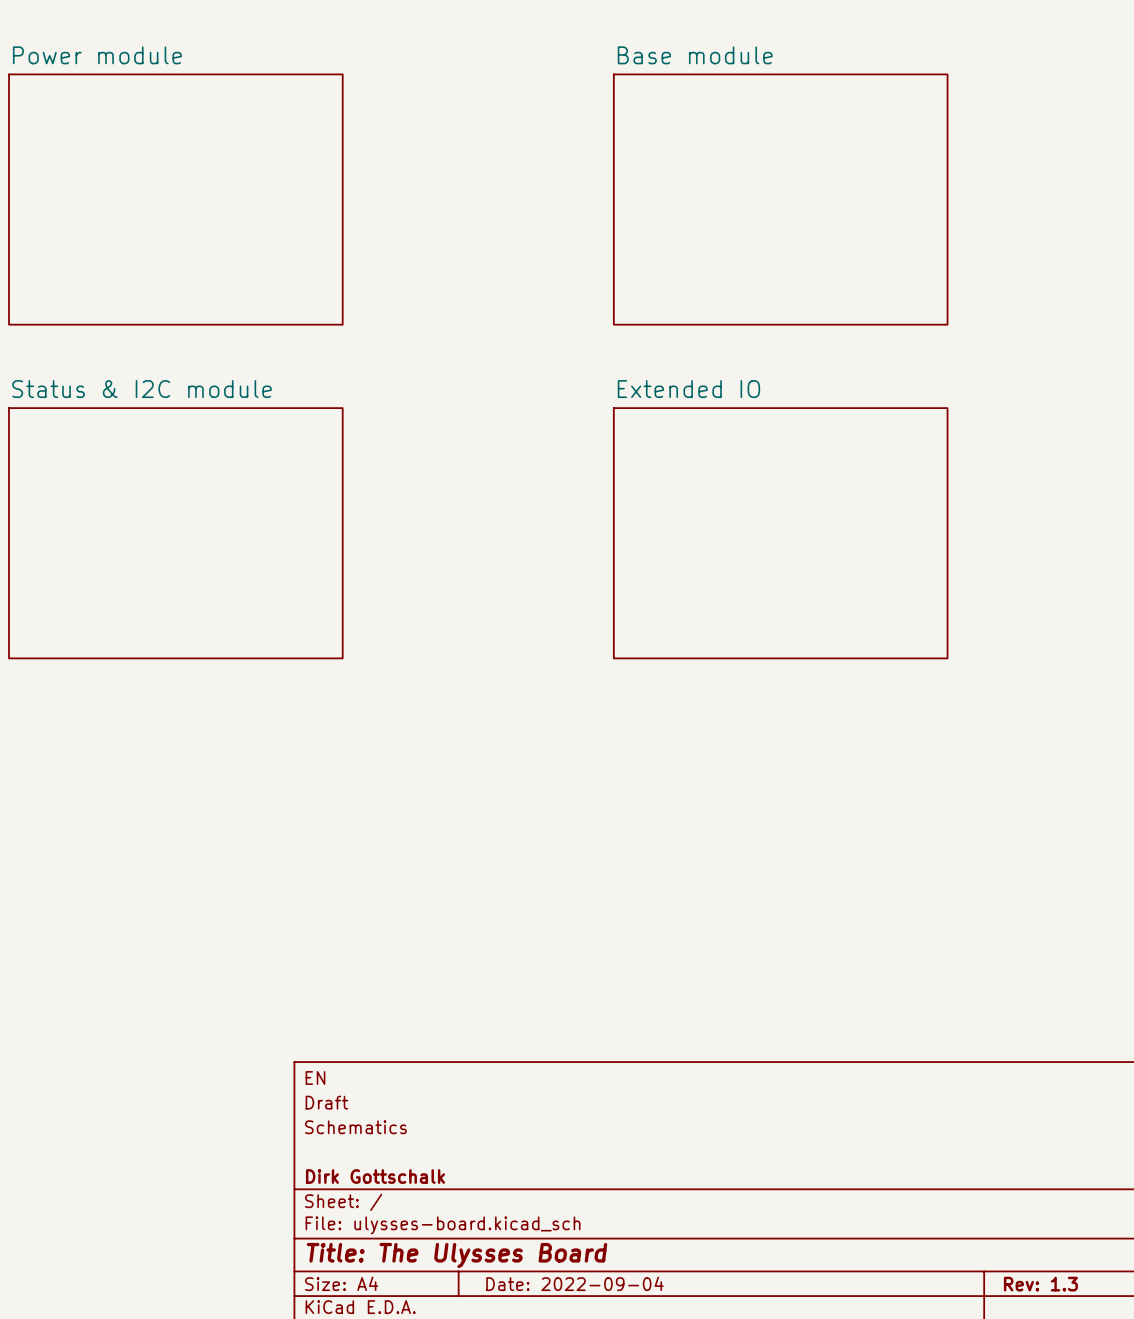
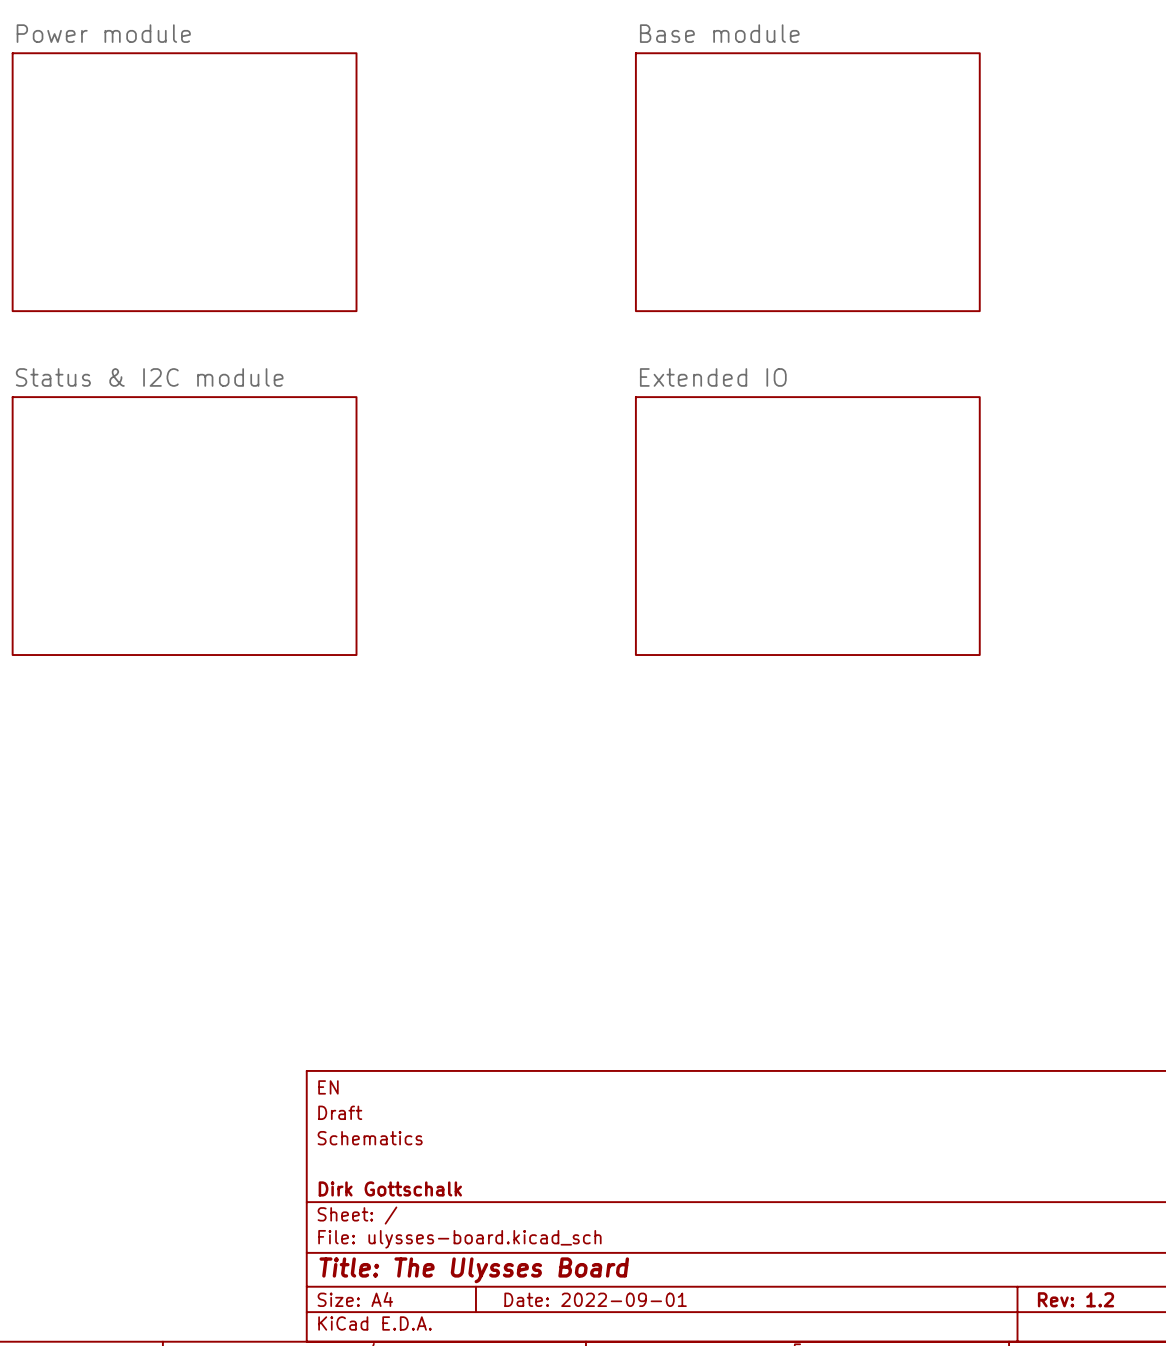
title block: Date: 2022-09-04 (575, 1283) -> Date: 2022-09-01 (595, 1299)
title block: Rev: 1.3 (1040, 1284) -> Rev: 1.2 (1075, 1299)

